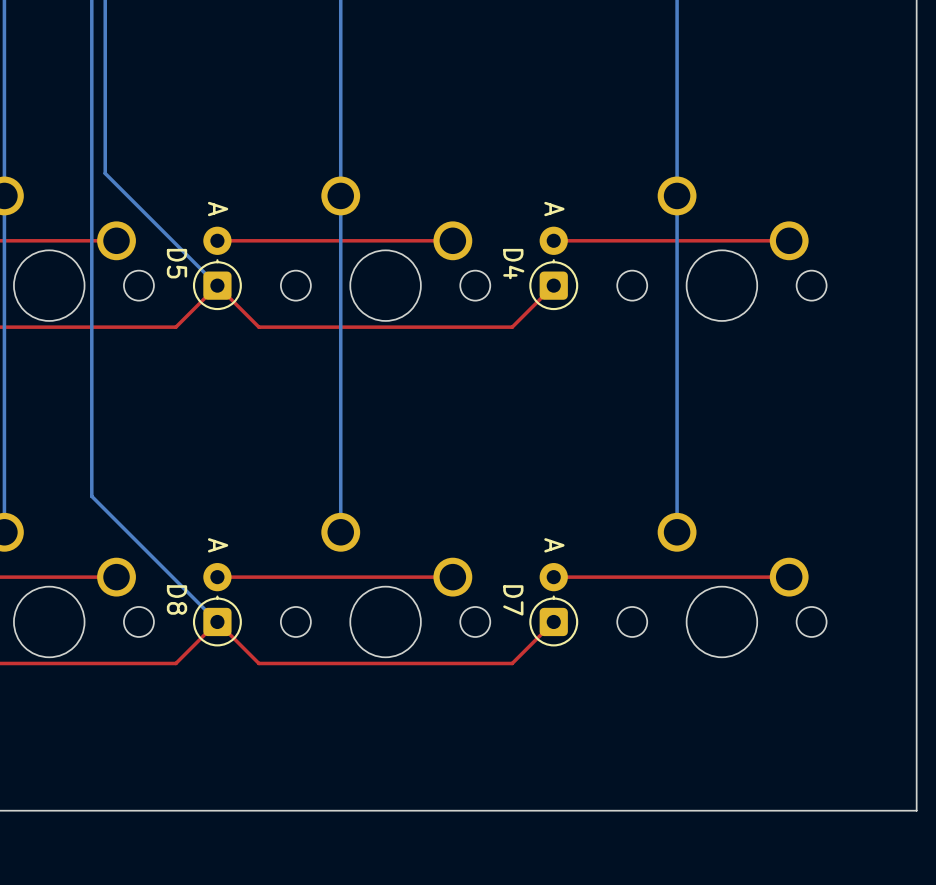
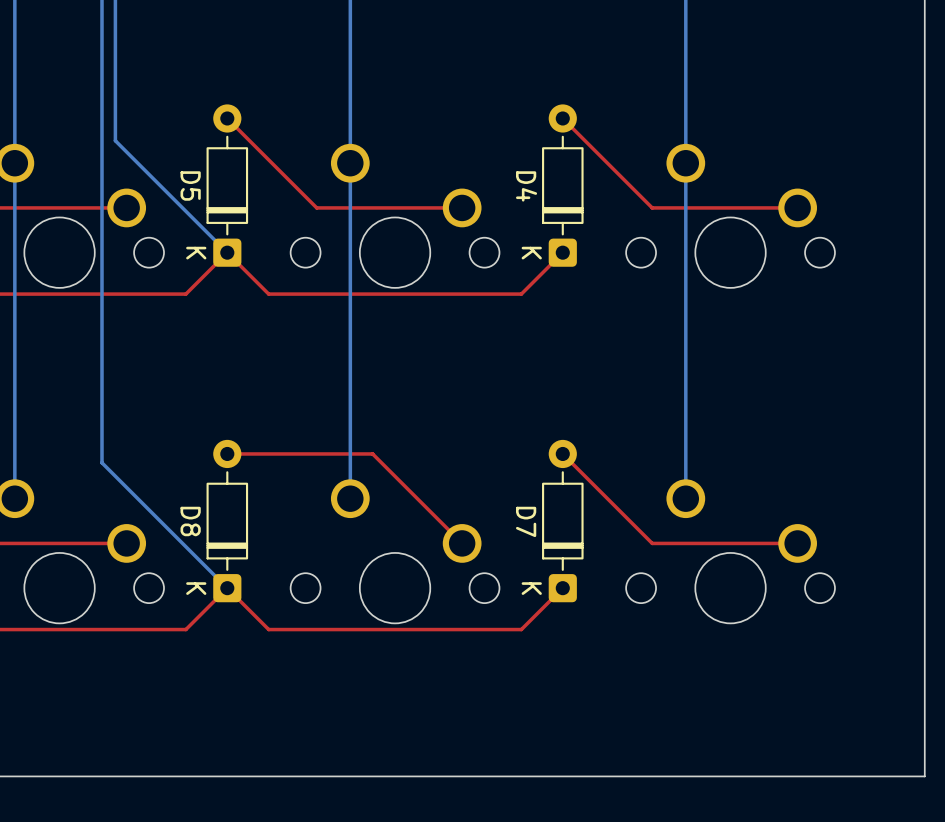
D5 footprint: [192, 226, 242, 311] -> [206, 104, 249, 267]
D4 footprint: [529, 226, 579, 311] -> [542, 104, 584, 267]
top track: (307, 240) (217, 240) -> (316, 207) (227, 118)
top track: (643, 240) (553, 240) -> (652, 207) (562, 118)
D8 footprint: [192, 563, 242, 647] -> [206, 439, 249, 603]
D7 footprint: [529, 563, 579, 647] -> [542, 439, 584, 603]
top track: (452, 577) (217, 577) -> (462, 543) (372, 453) (227, 453)
top track: (643, 577) (553, 577) -> (652, 543) (562, 453)

